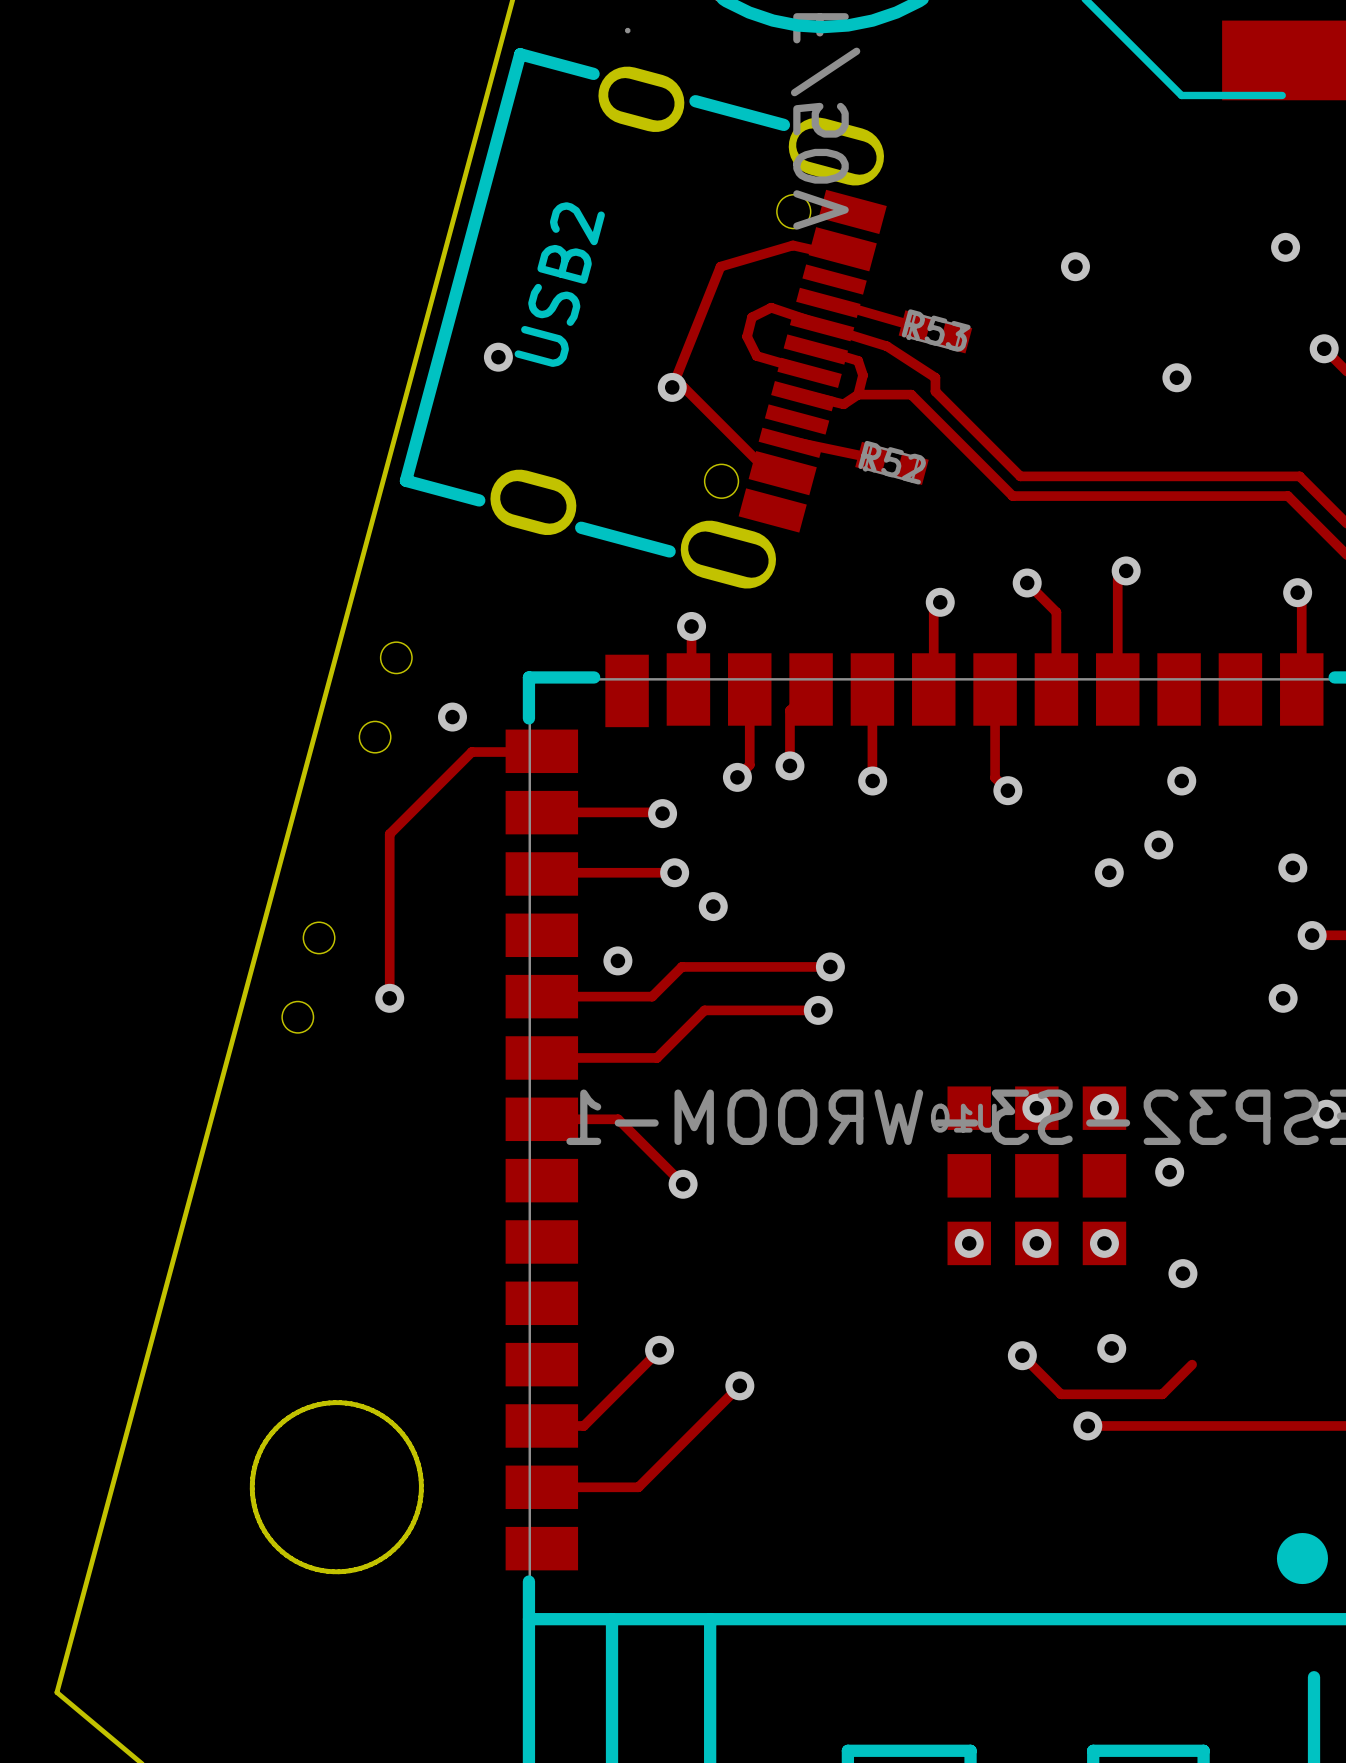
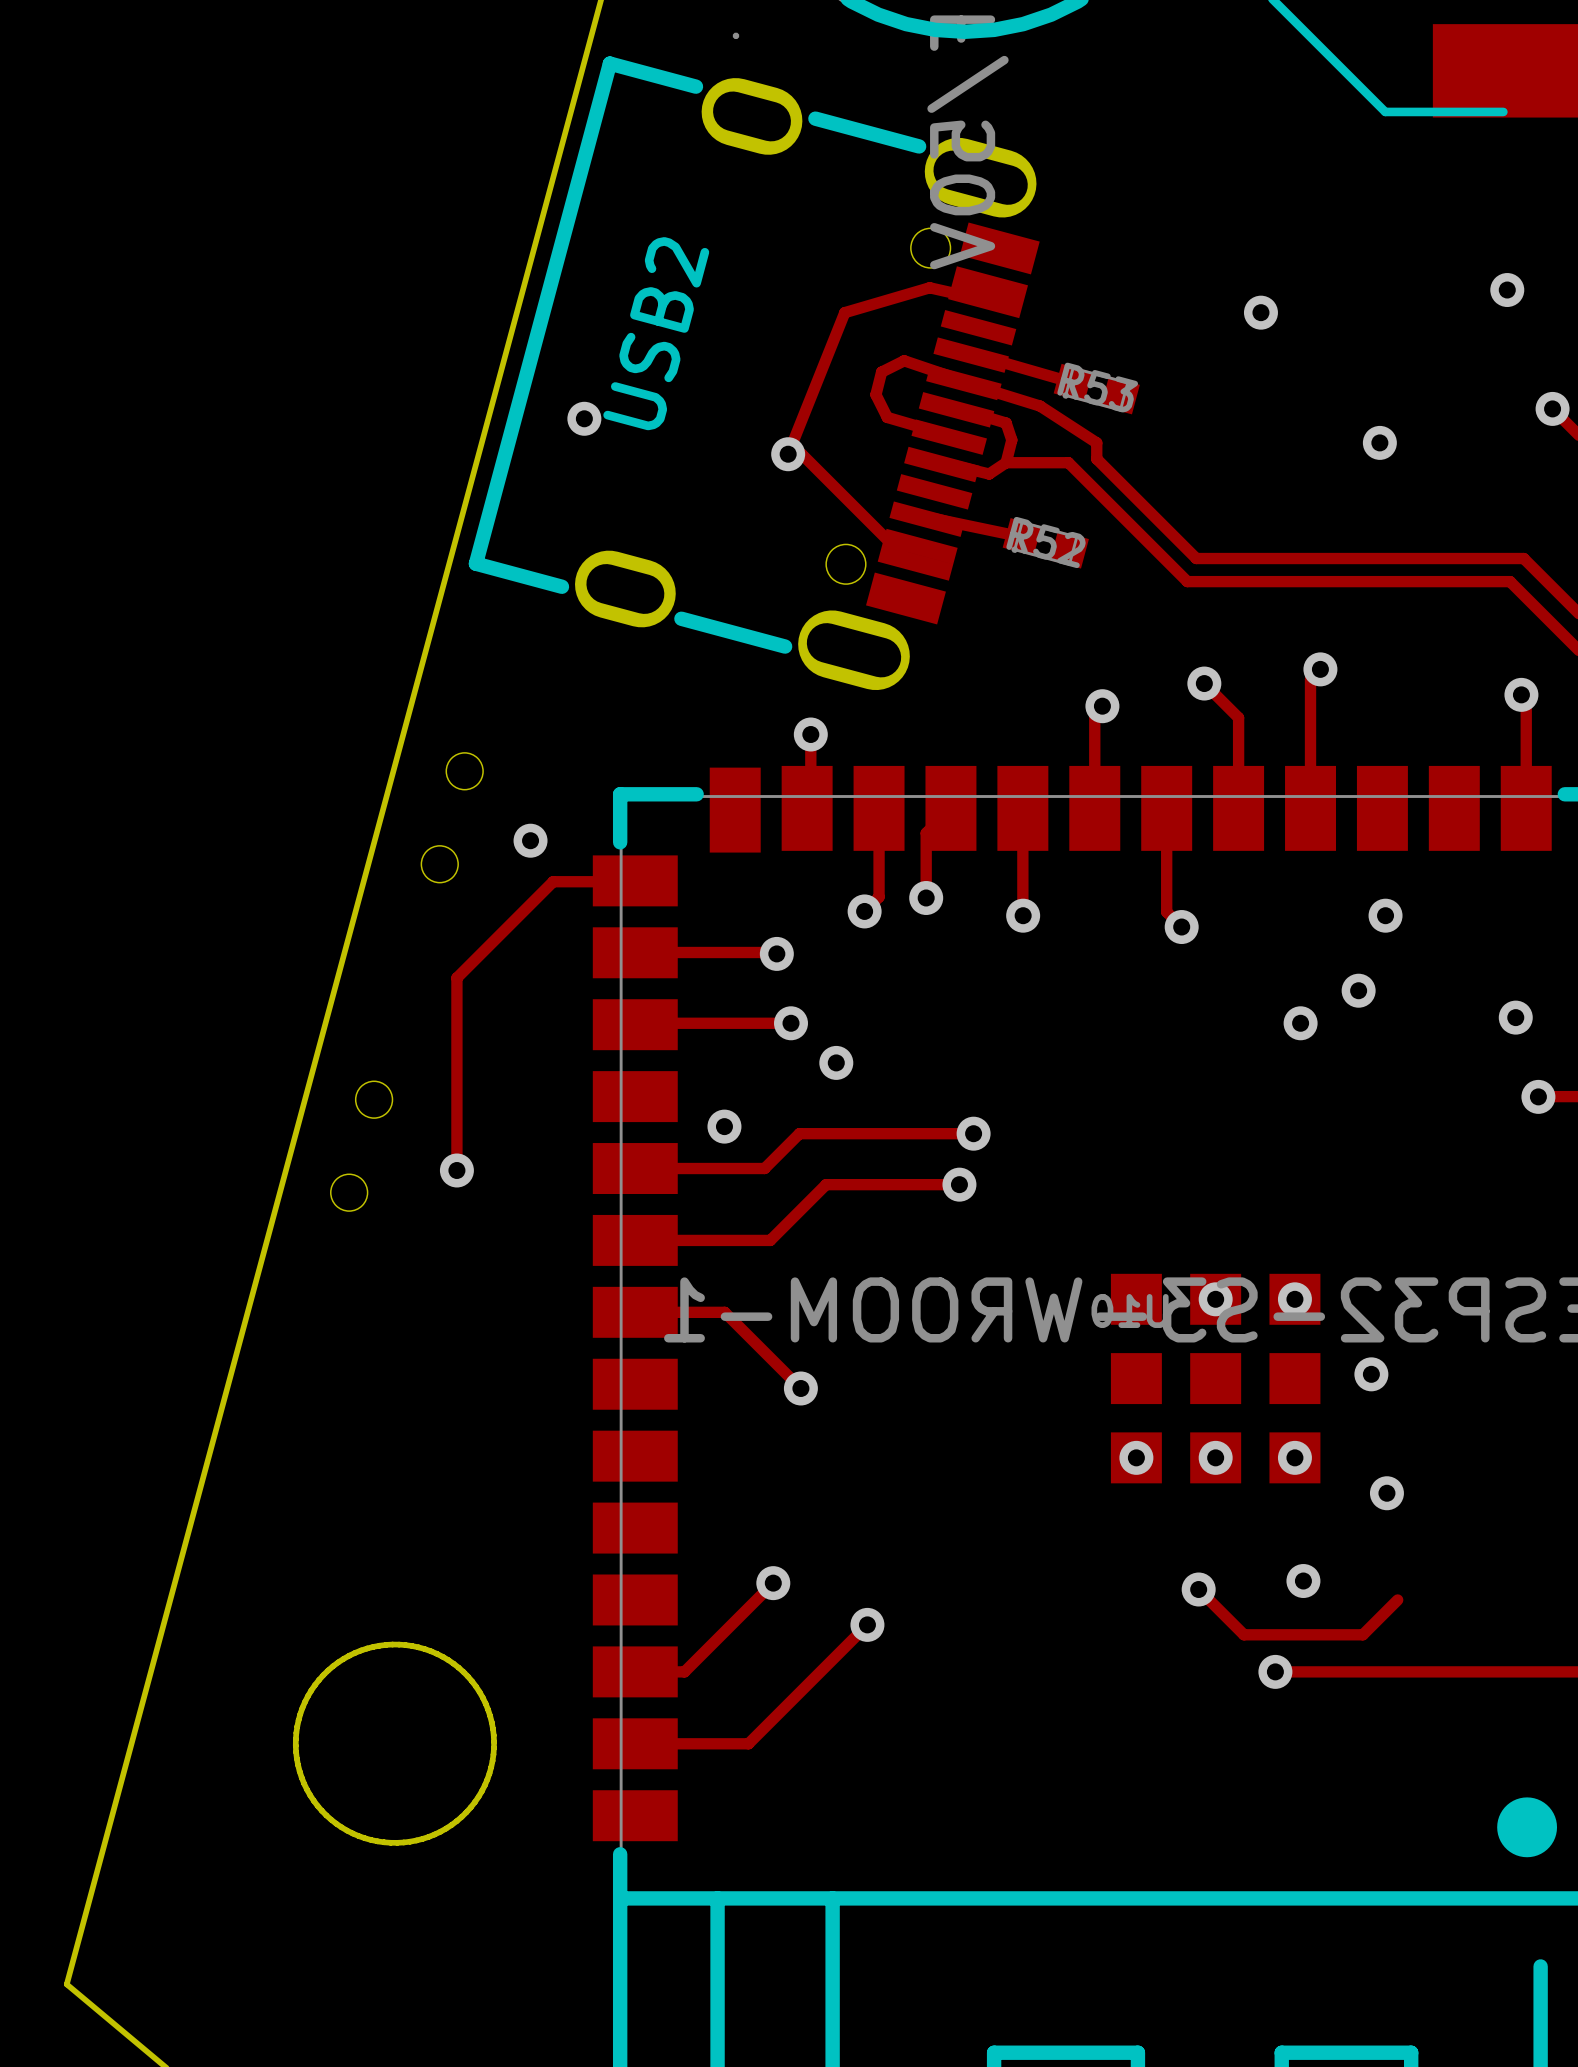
via: (1283, 998) -> none
via: (1326, 1114) -> none

